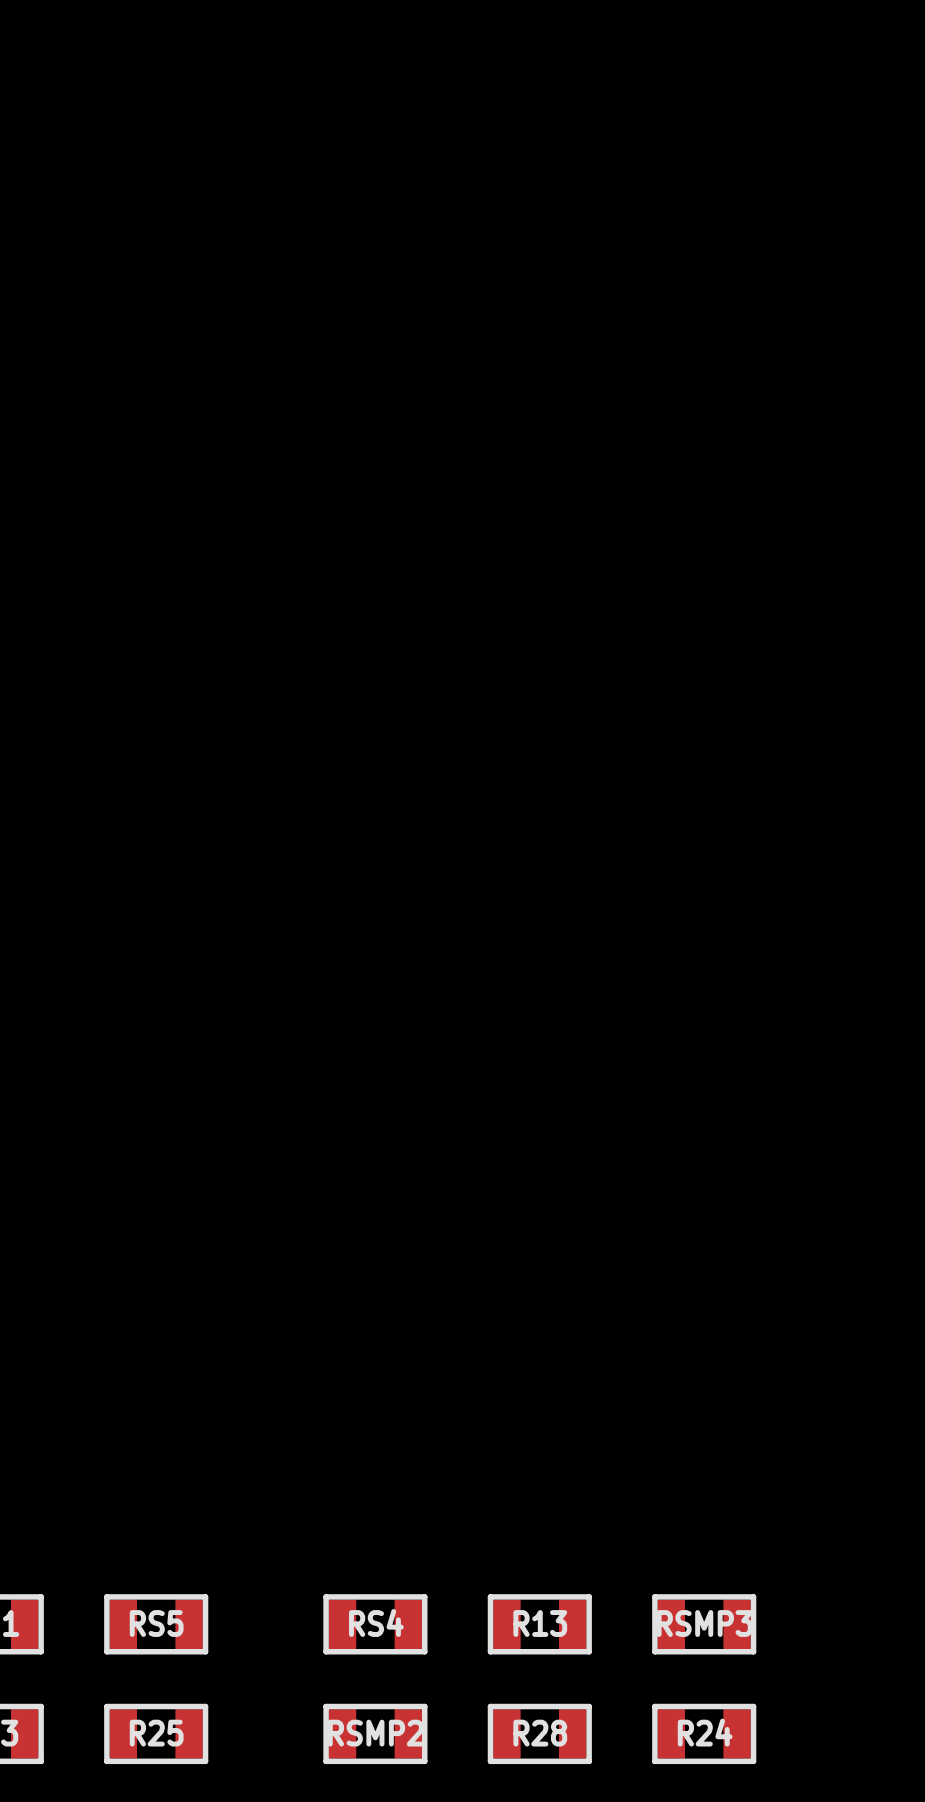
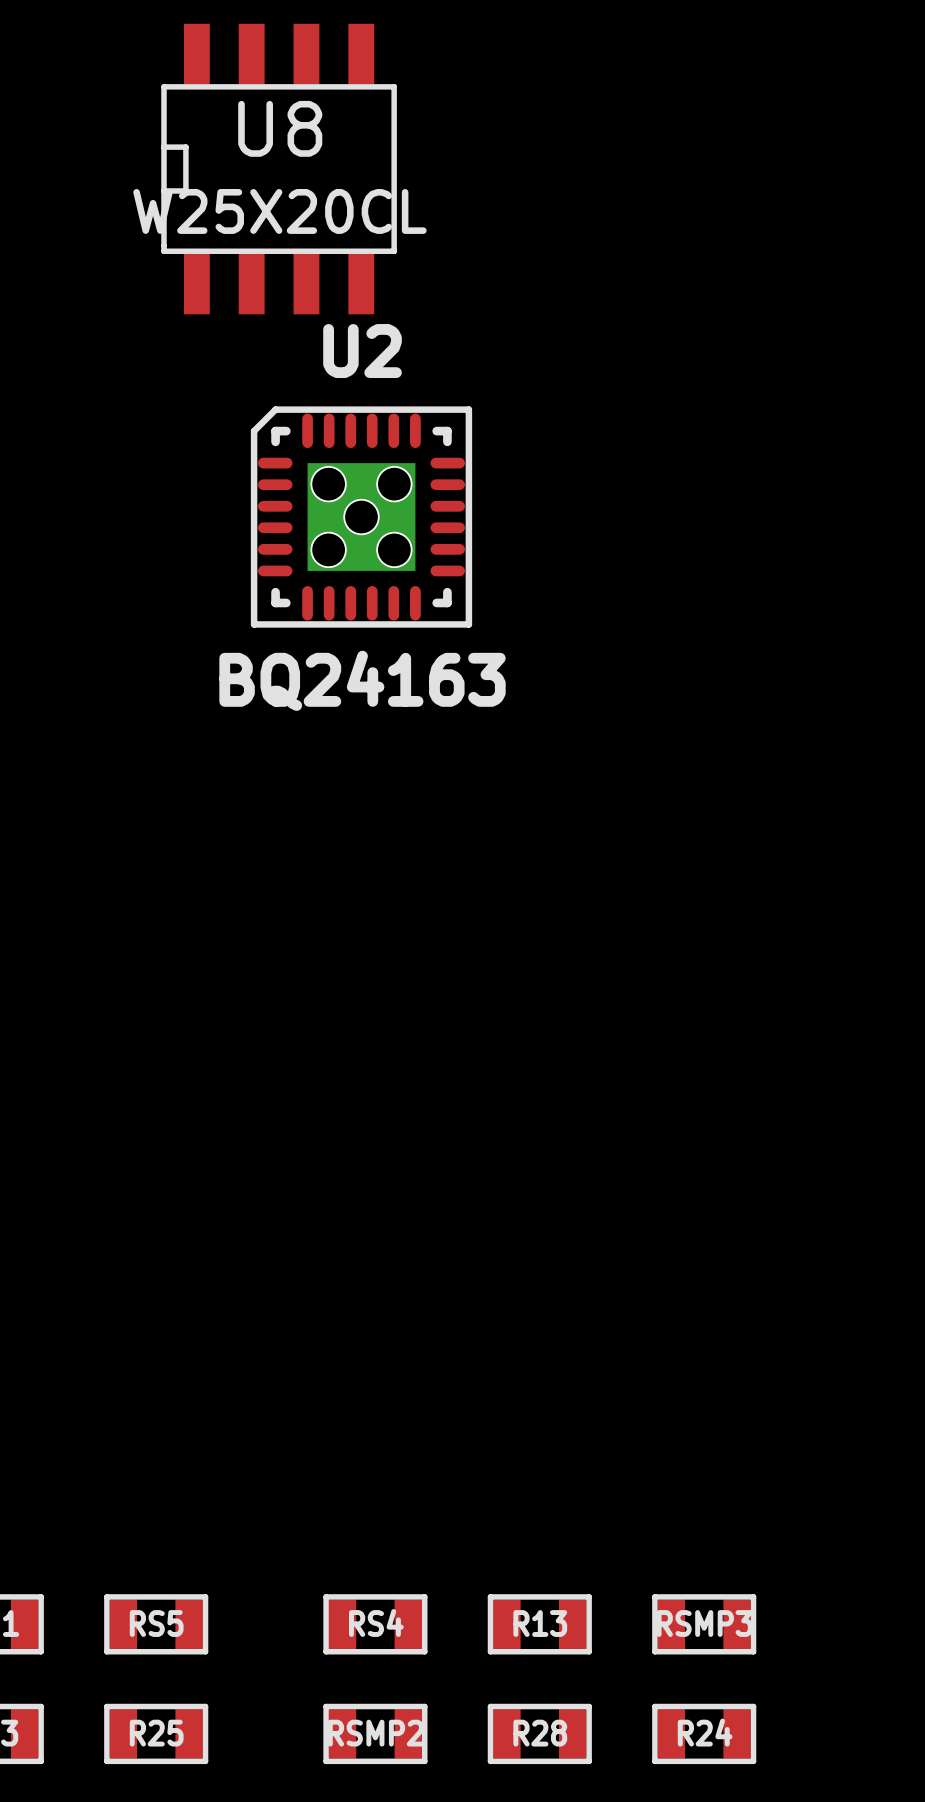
U8: none -> W25X20CL (279, 169)
U2: none -> BQ24163 (361, 517)

